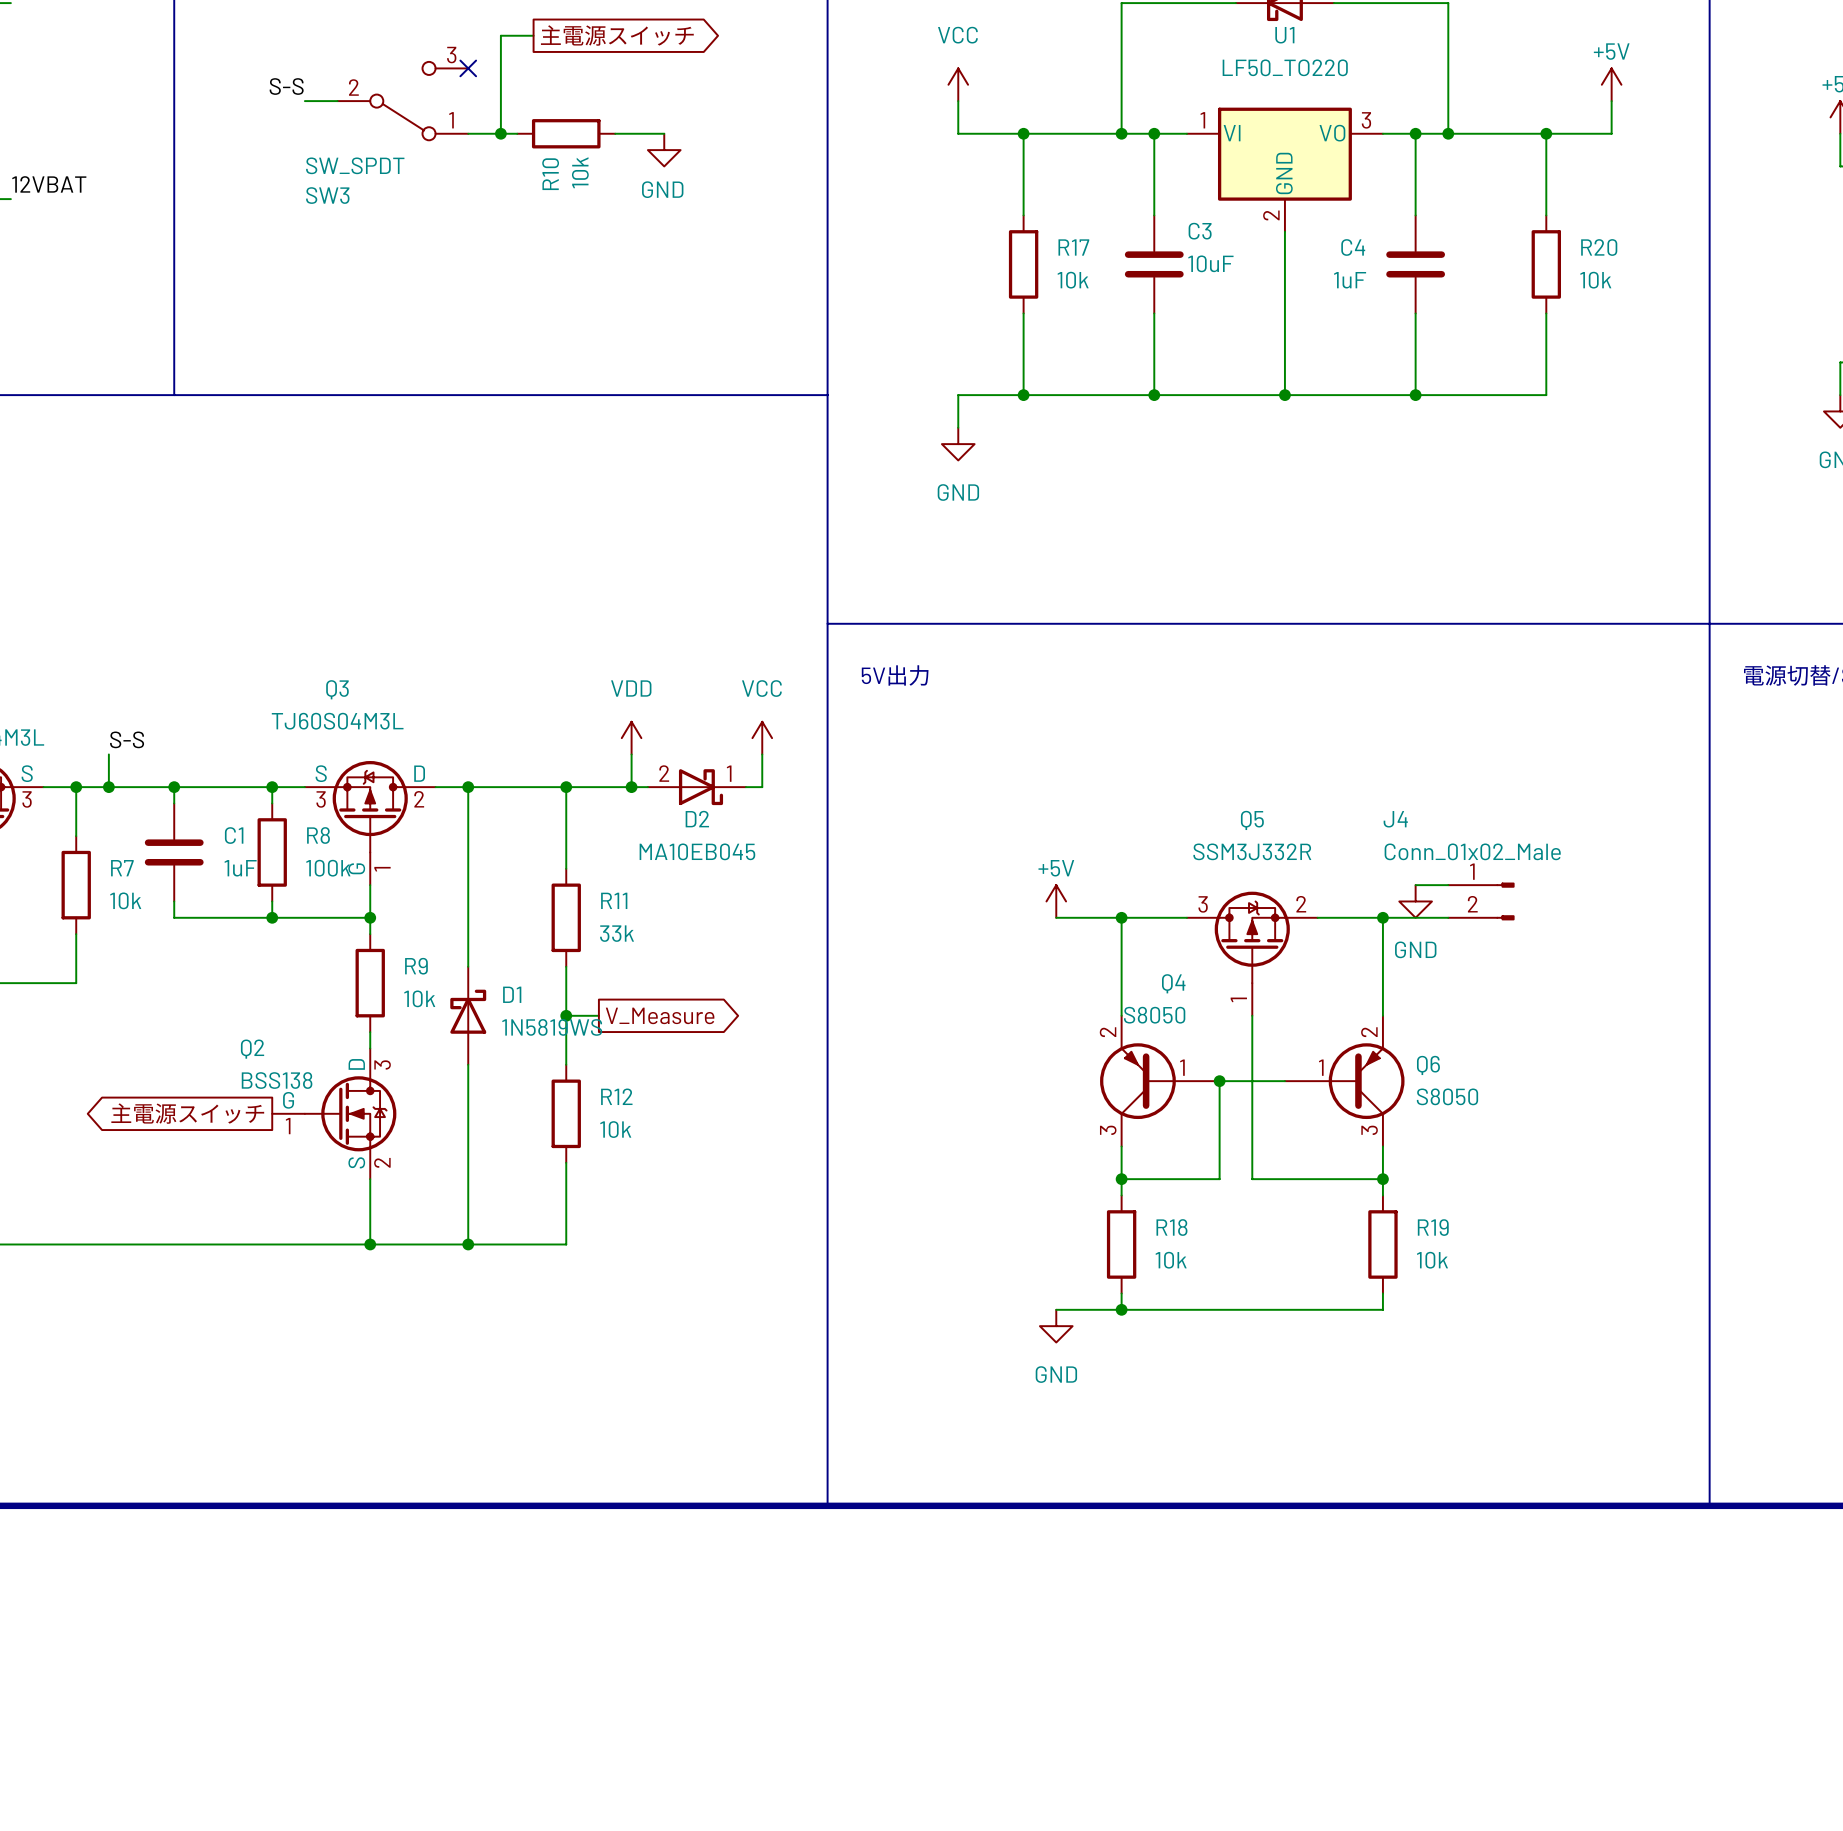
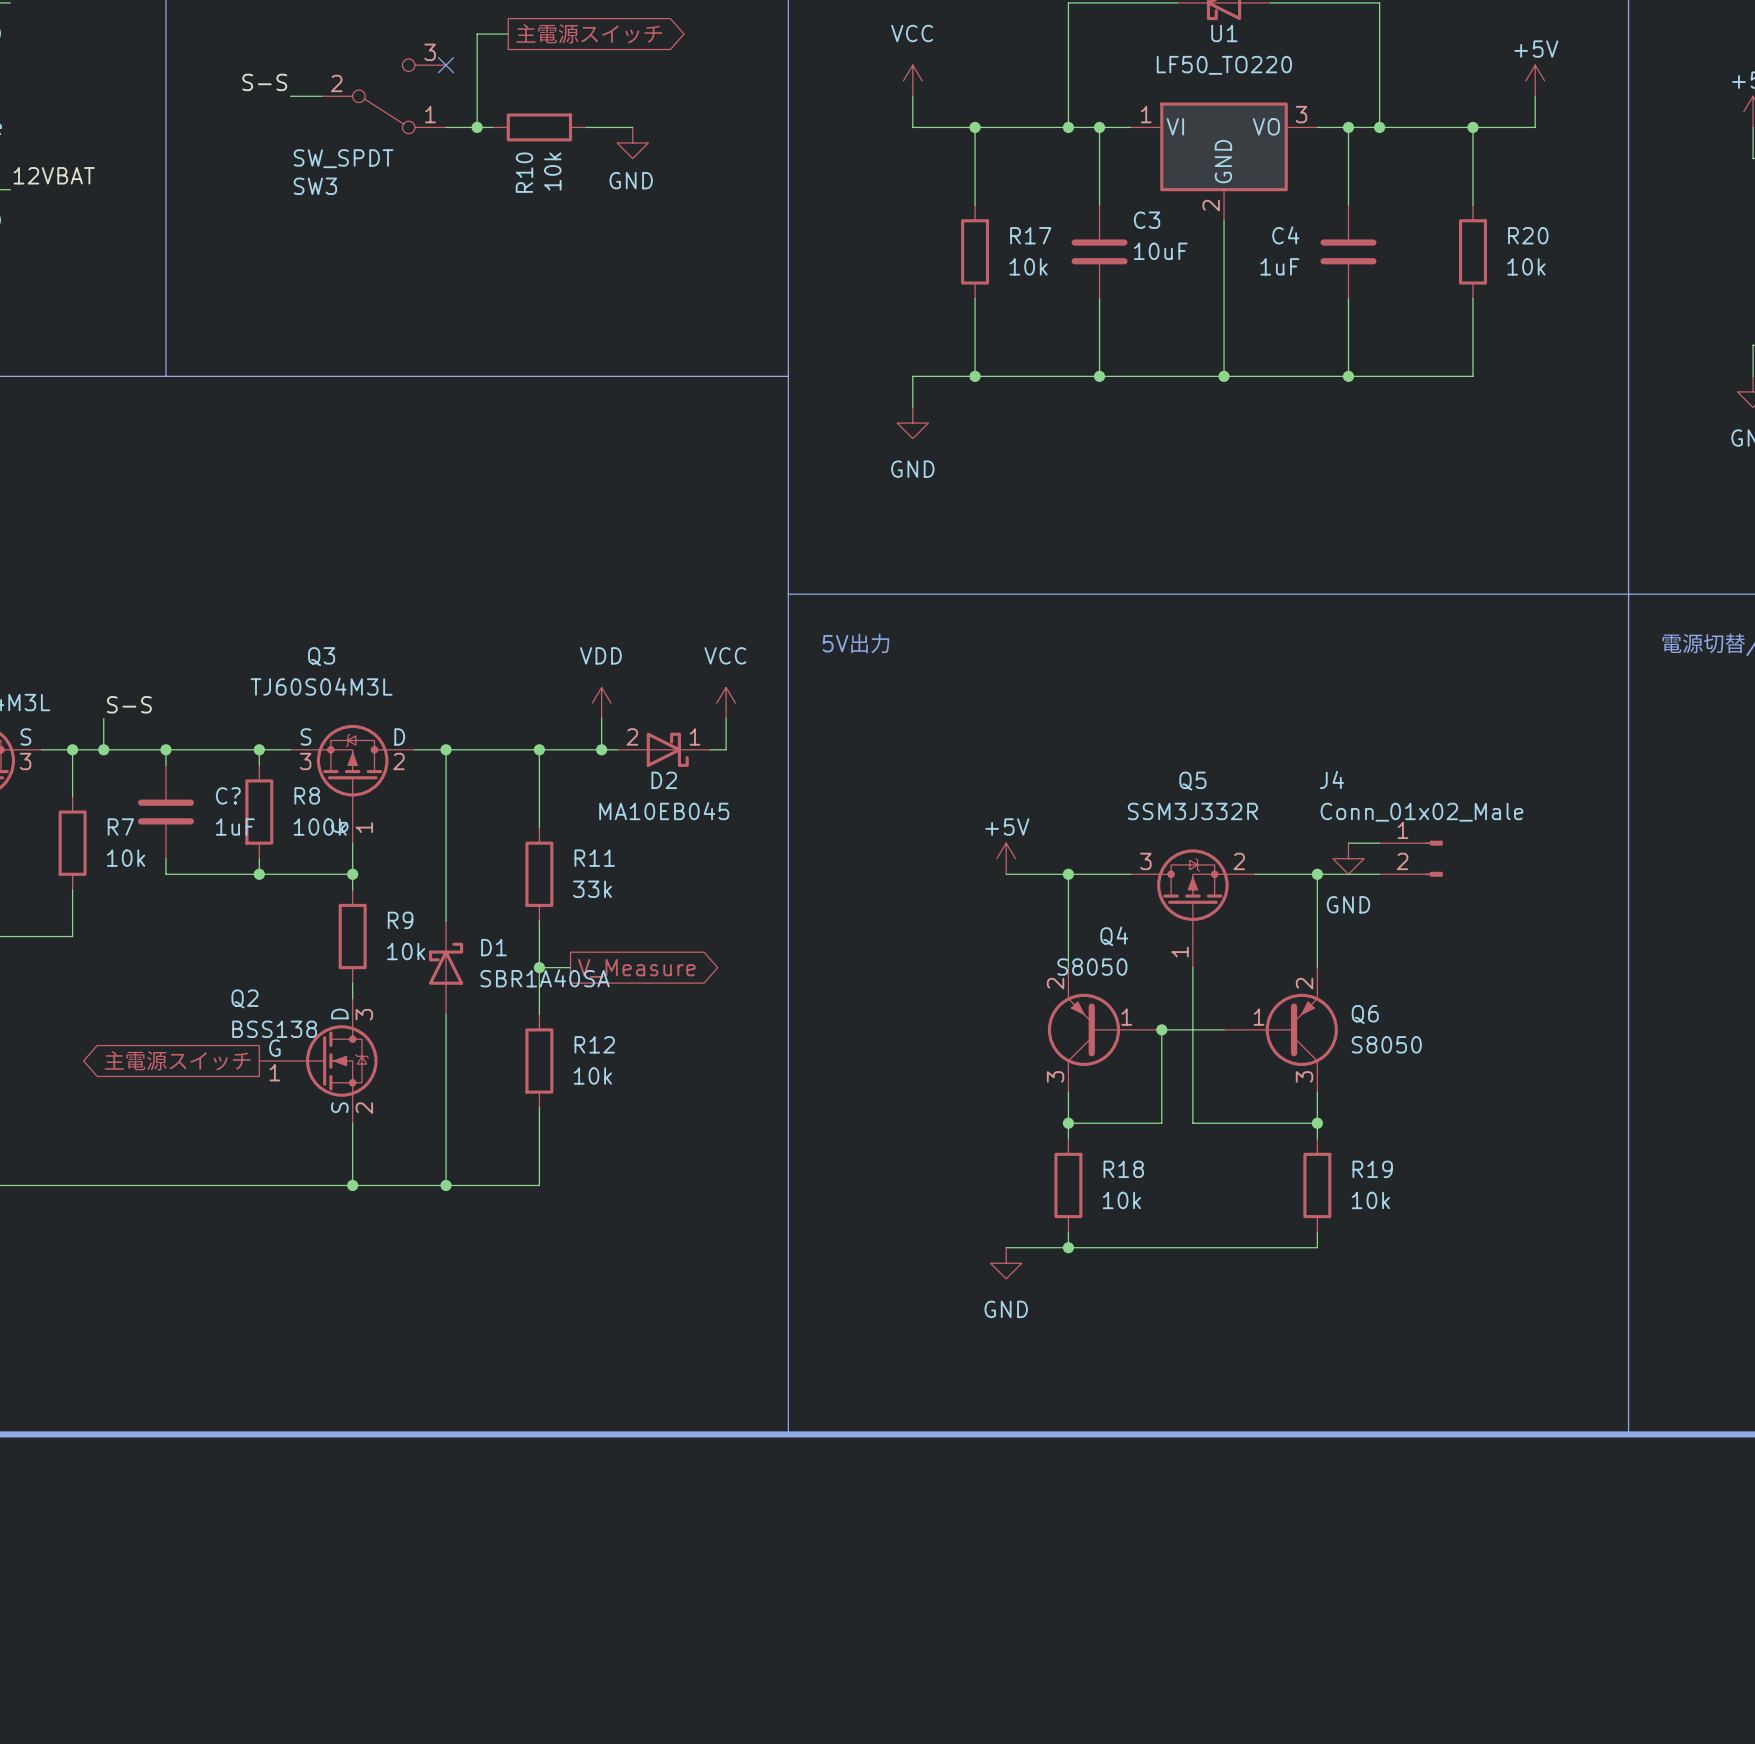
C1 name: C1 (234, 835) -> C? (228, 795)
D1 value: 1N5819WS (552, 1027) -> SBR1A40SA (545, 978)

